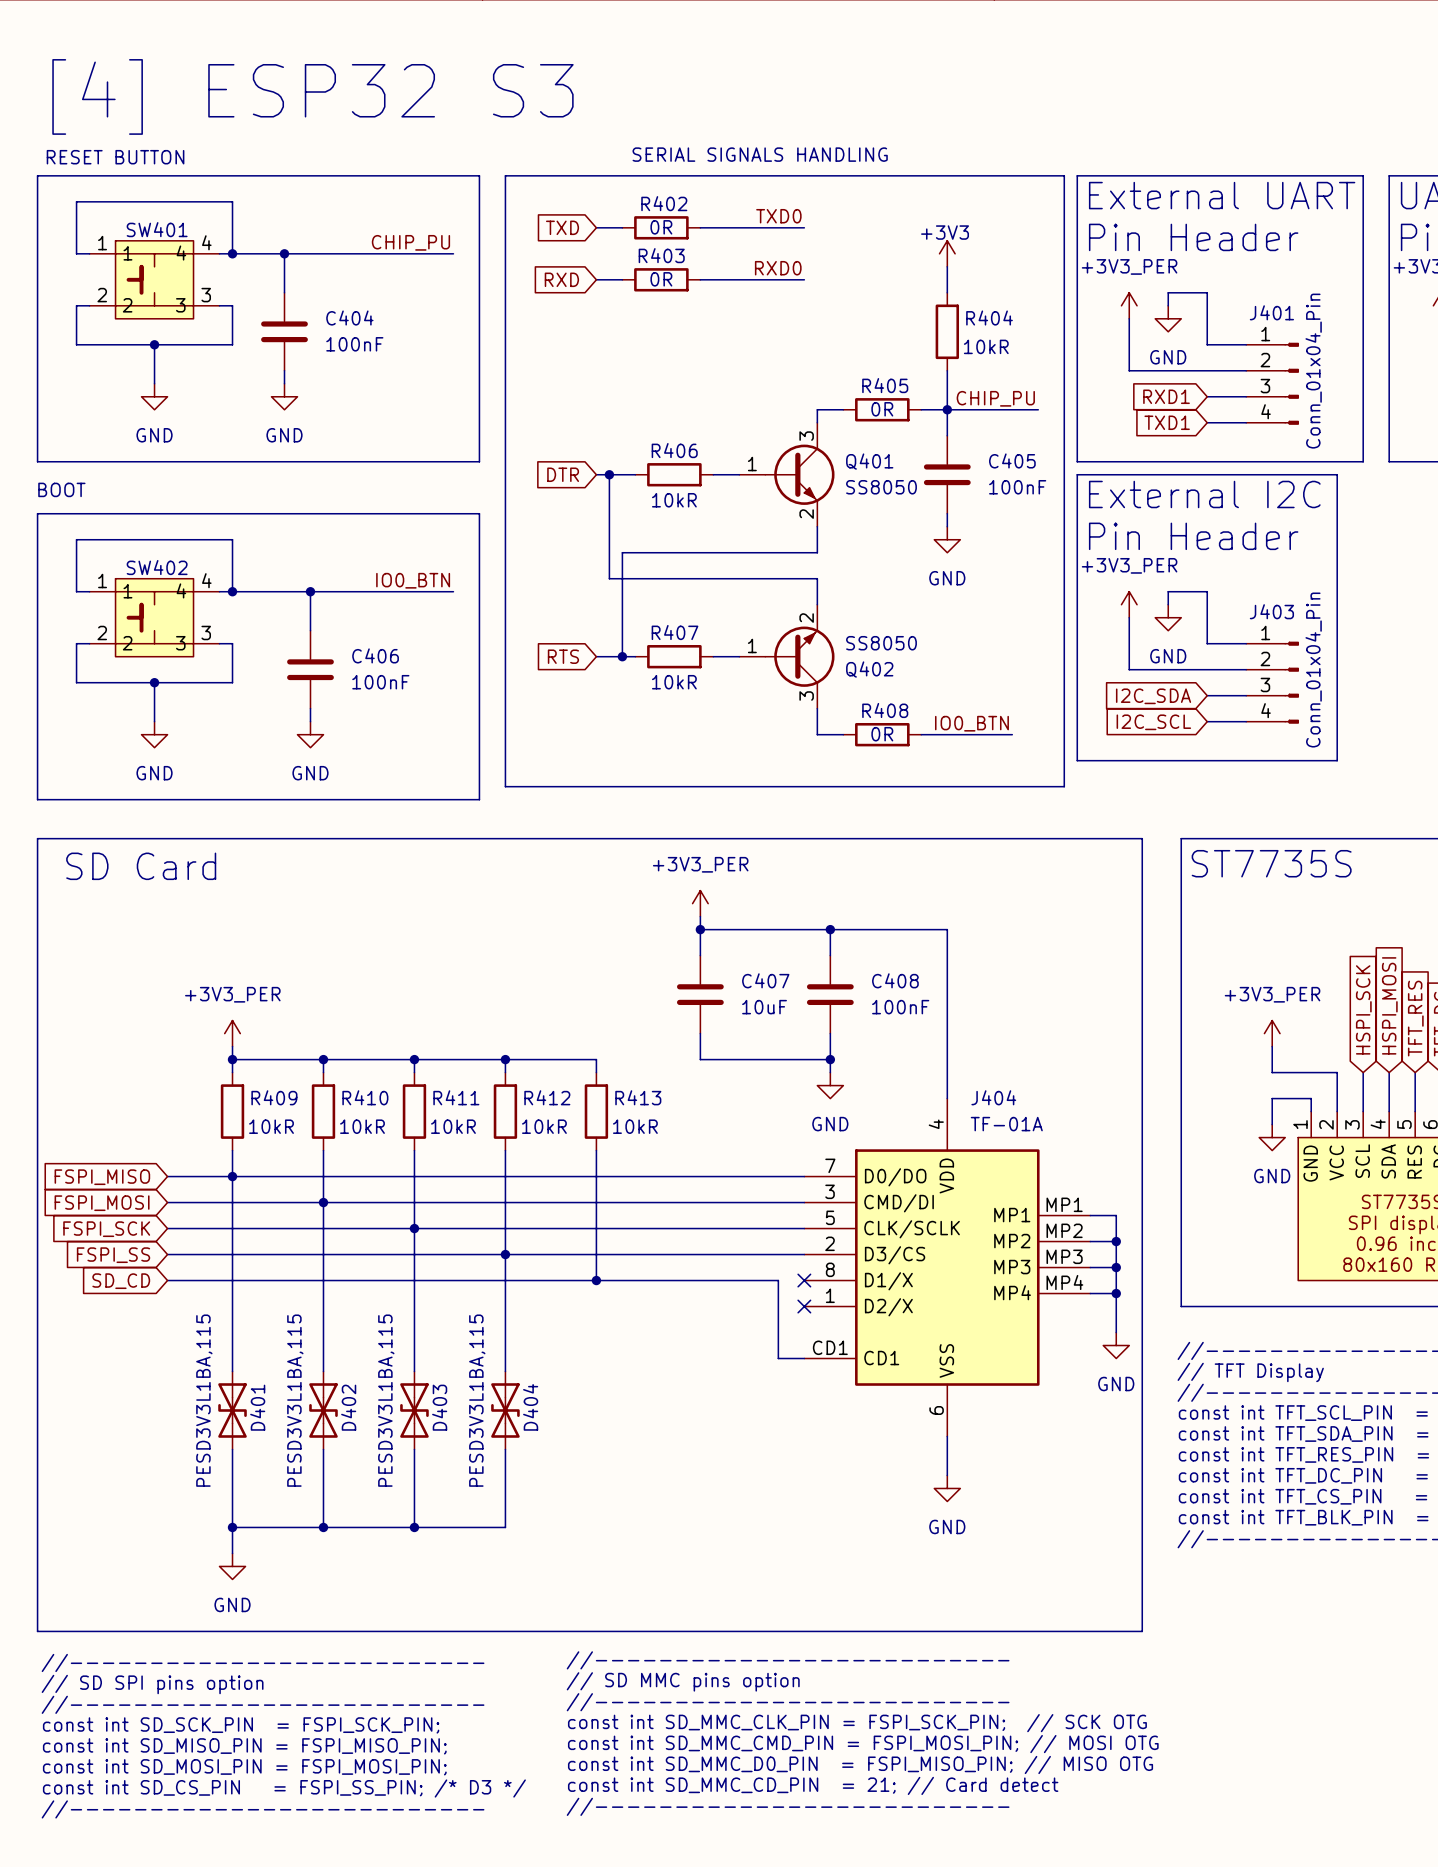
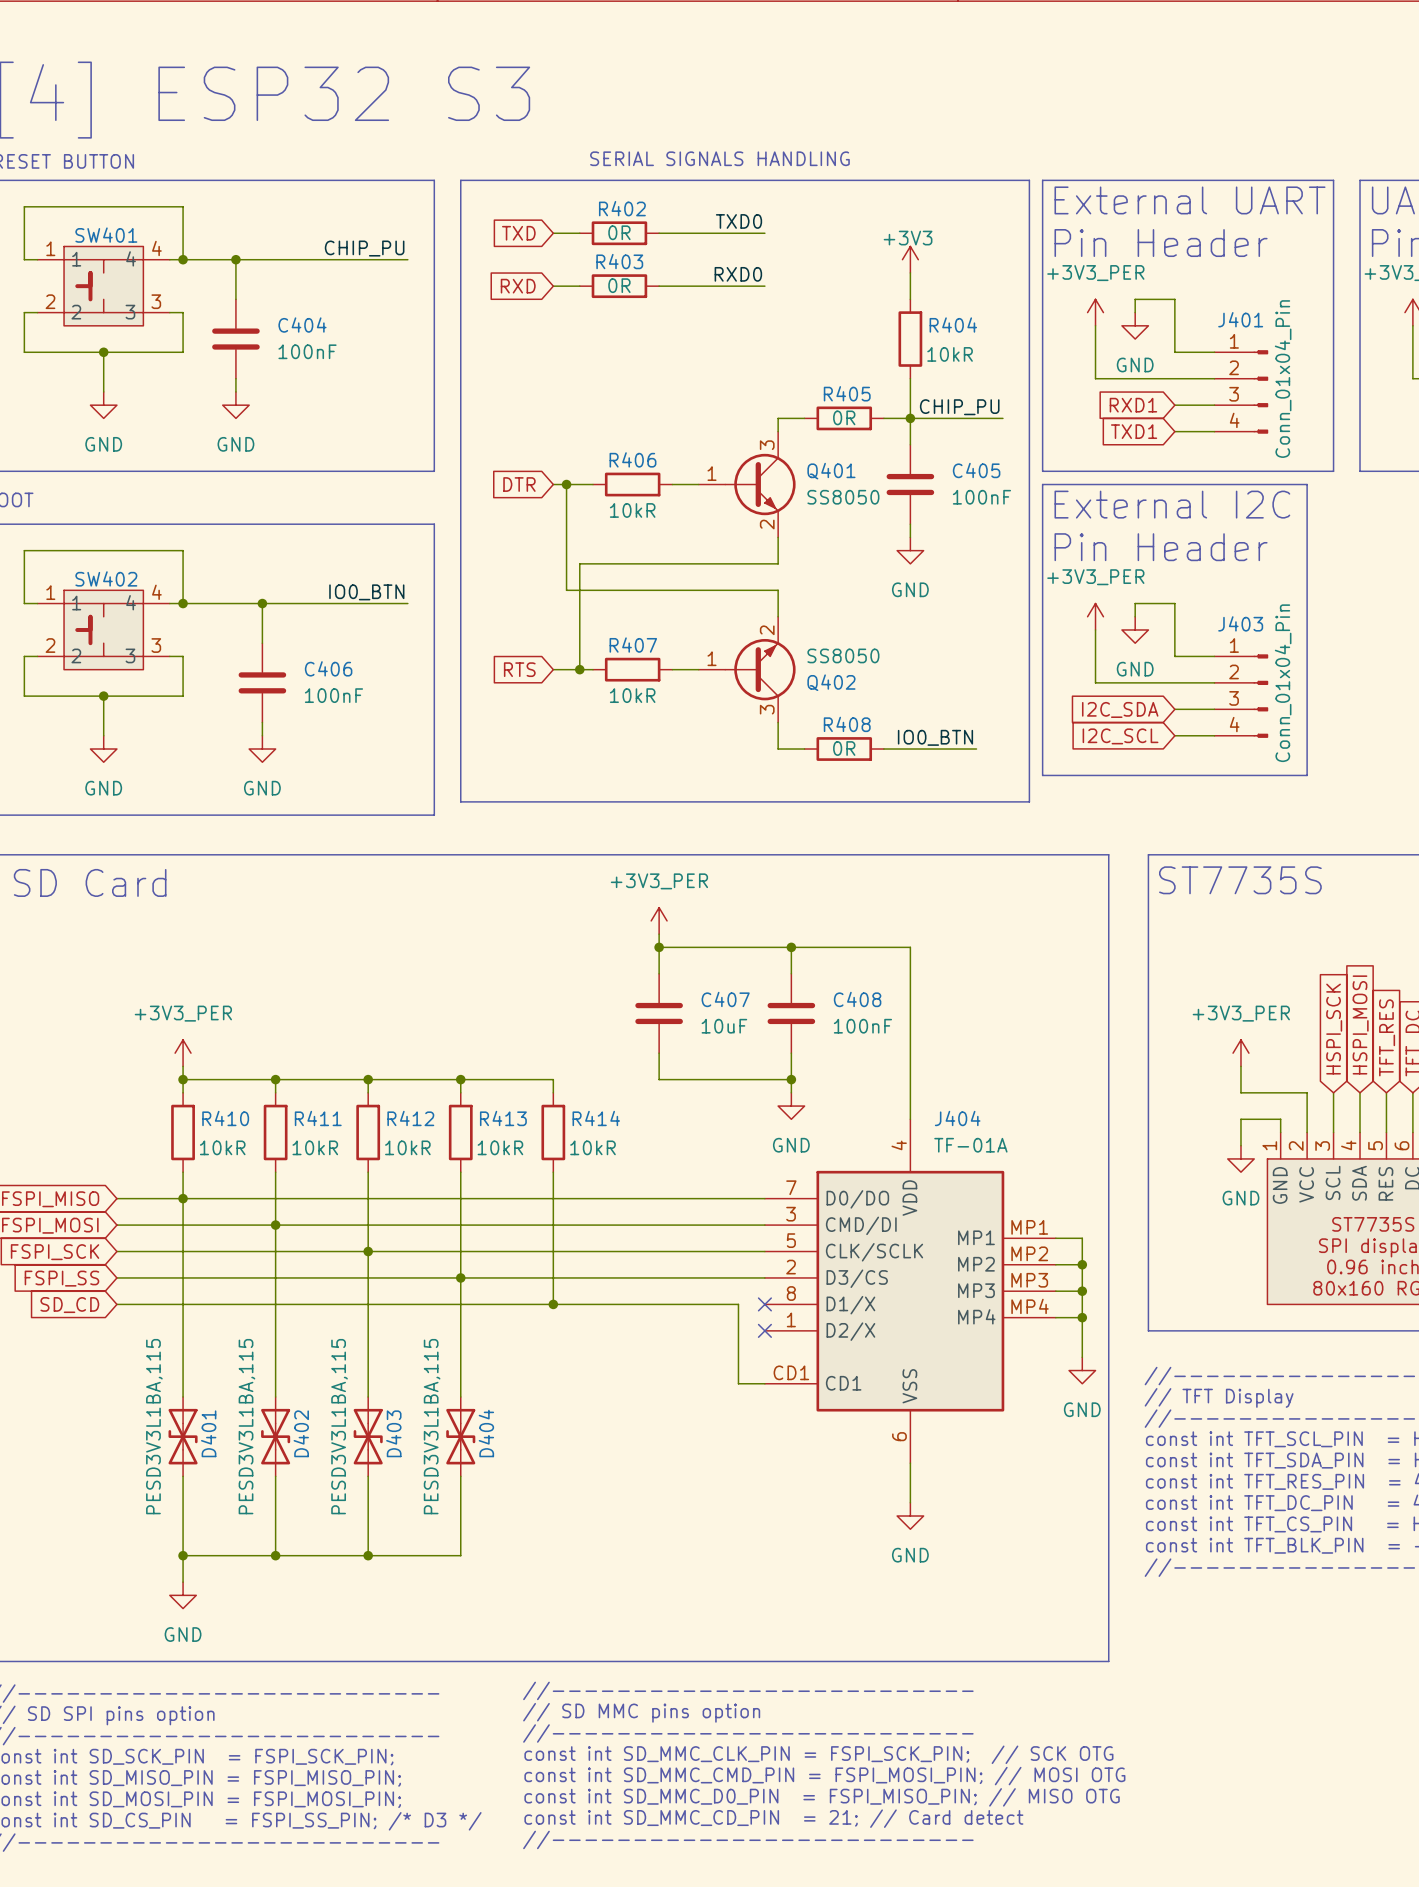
R409 name: R409 (274, 1097) -> R410 (225, 1118)
R410 name: R410 (365, 1097) -> R411 (318, 1118)
R411 name: R411 (456, 1097) -> R412 (410, 1118)
R412 name: R412 (547, 1097) -> R413 (503, 1118)
R413 name: R413 (638, 1097) -> R414 (596, 1118)

